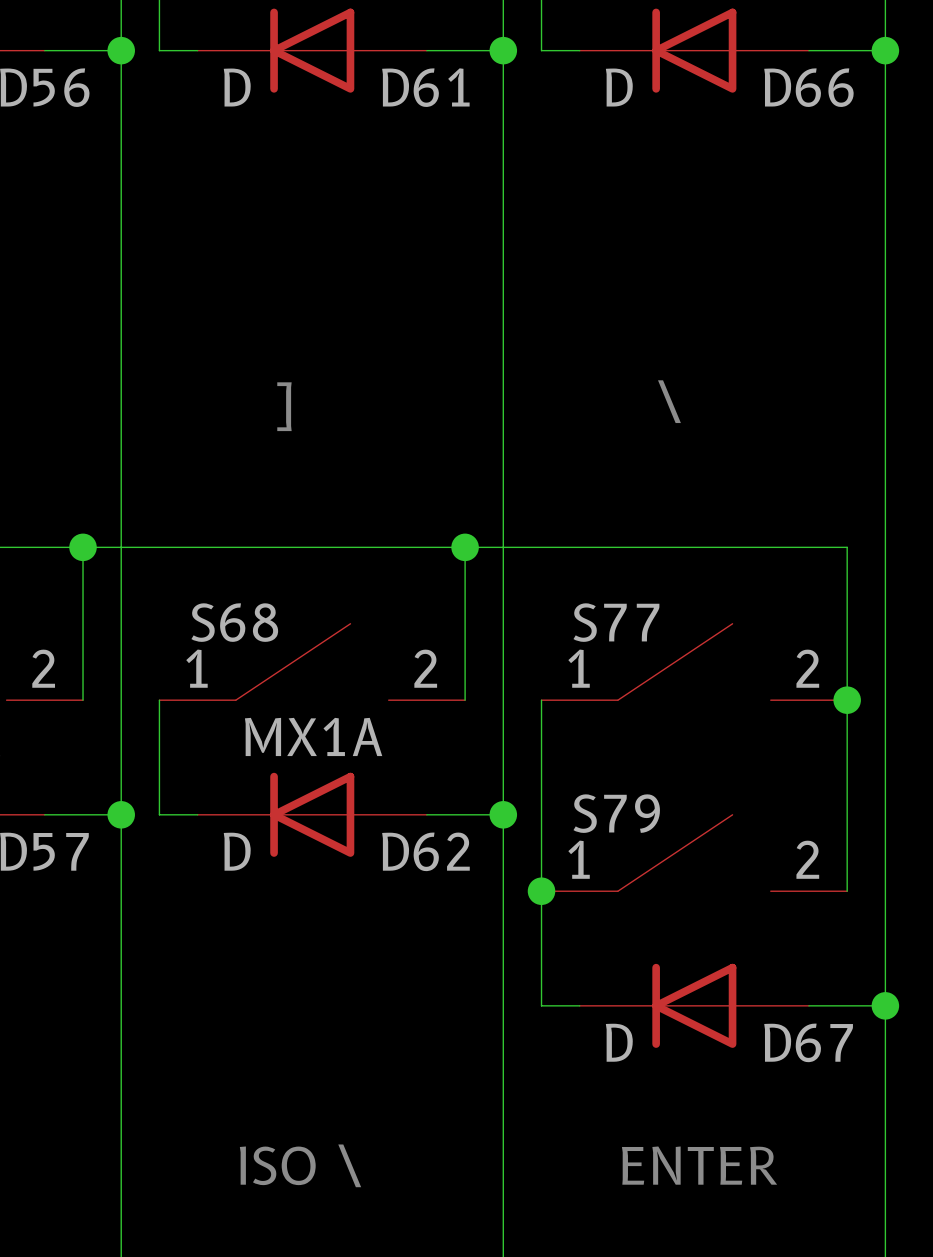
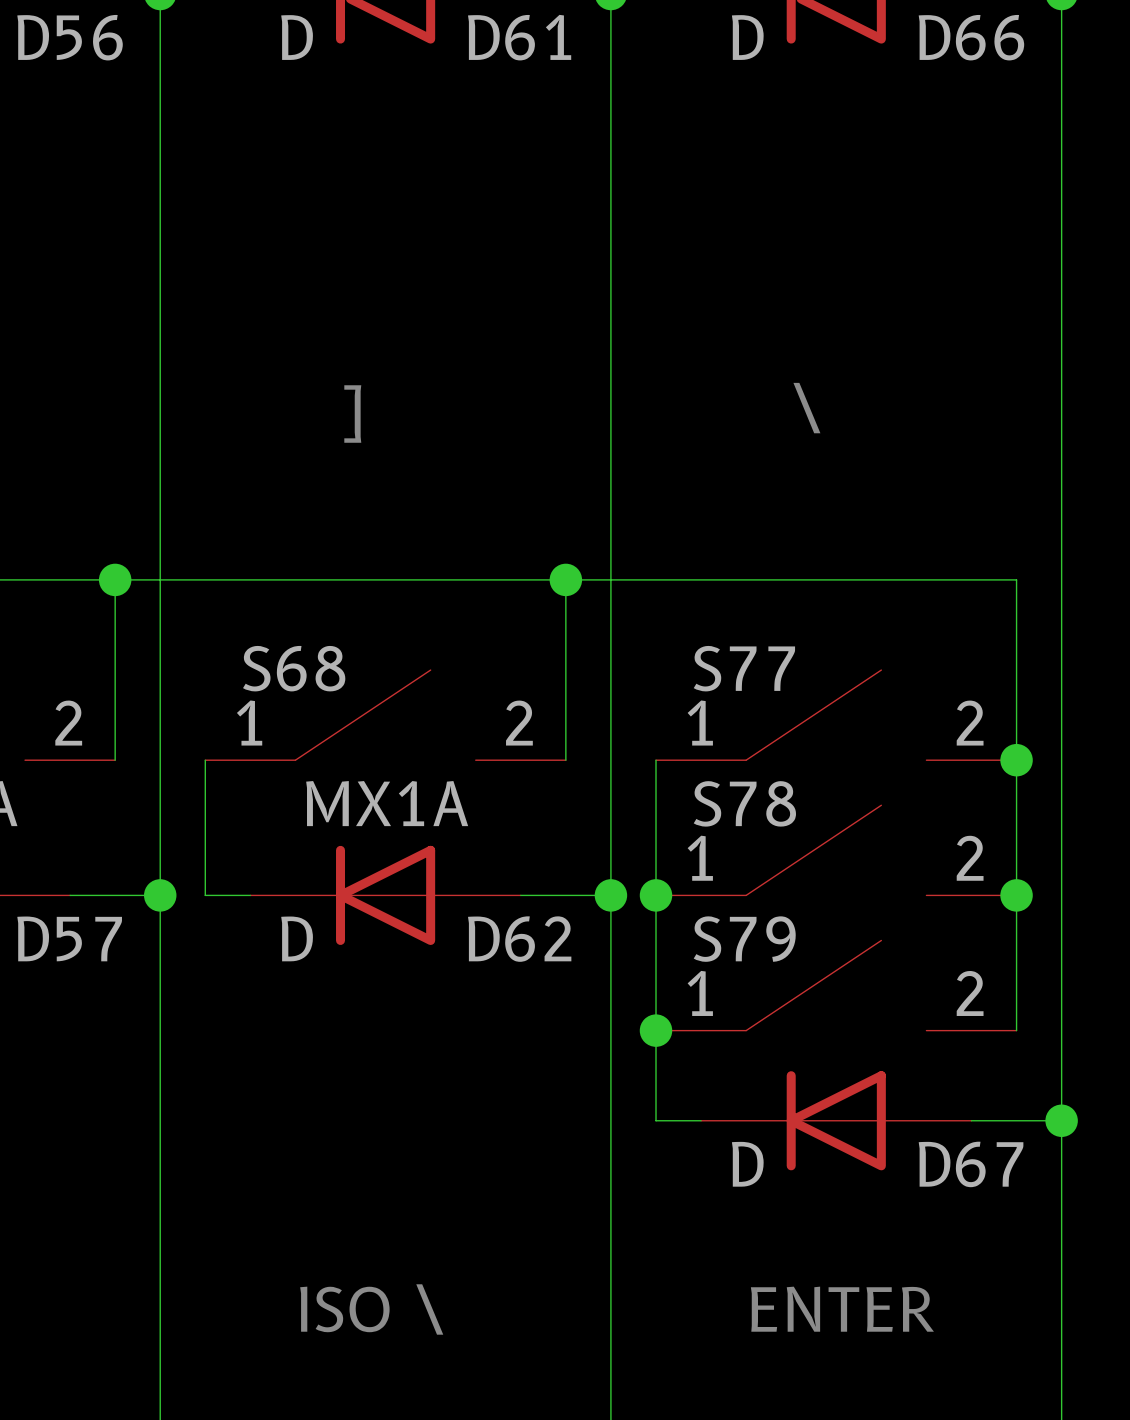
S78: none -> (836, 850)
junction: none -> (656, 895)
junction: none -> (1016, 895)
S79 position: (694, 853) -> (836, 985)
junction: (541, 891) -> none
wire: none -> (1016, 985) (1016, 1030)
junction: none -> (656, 1030)

